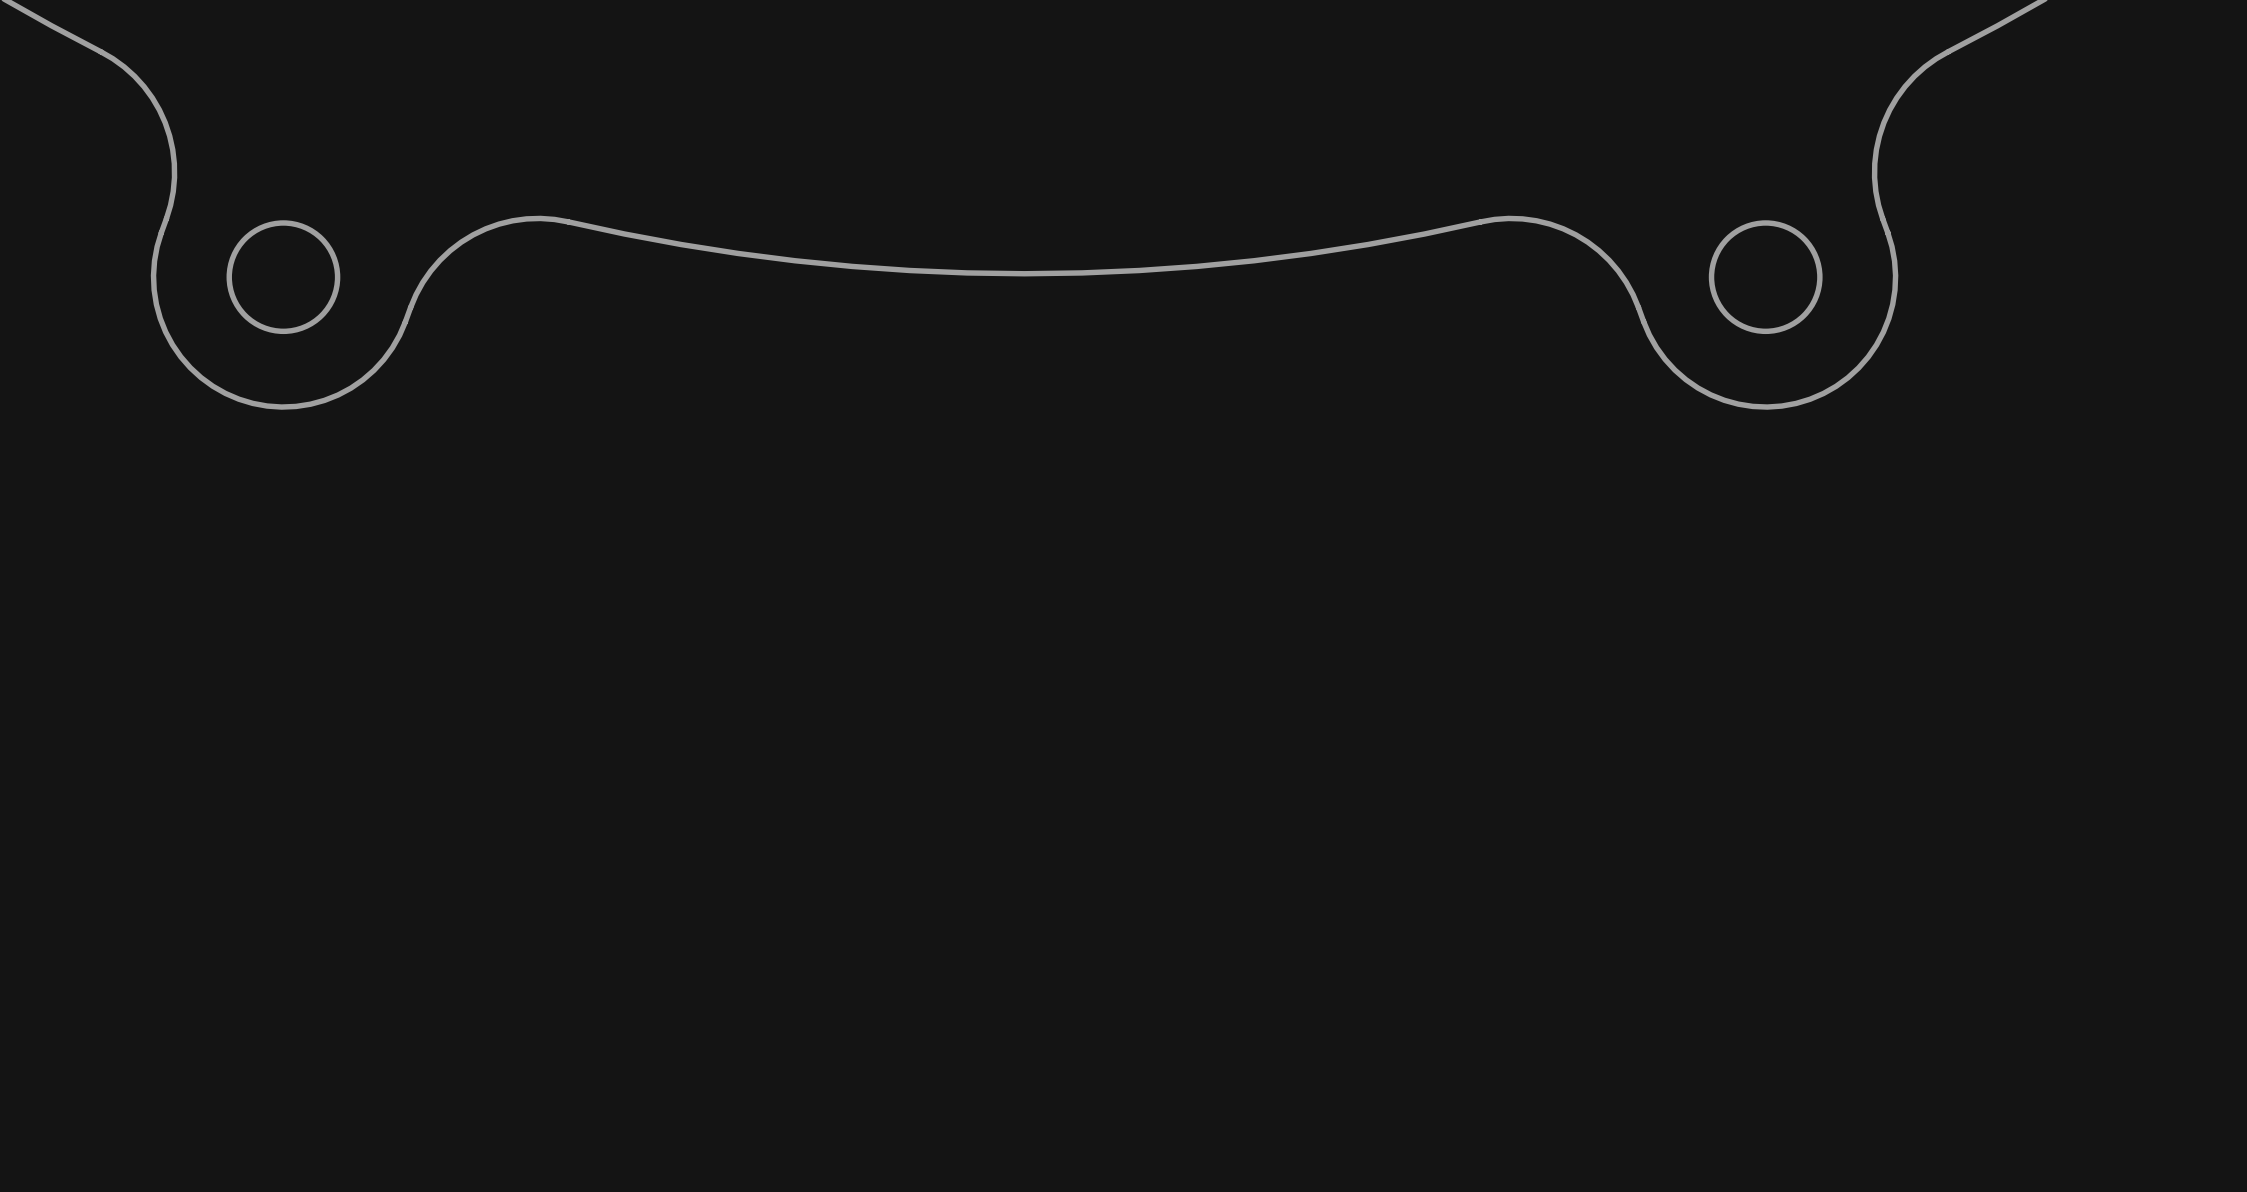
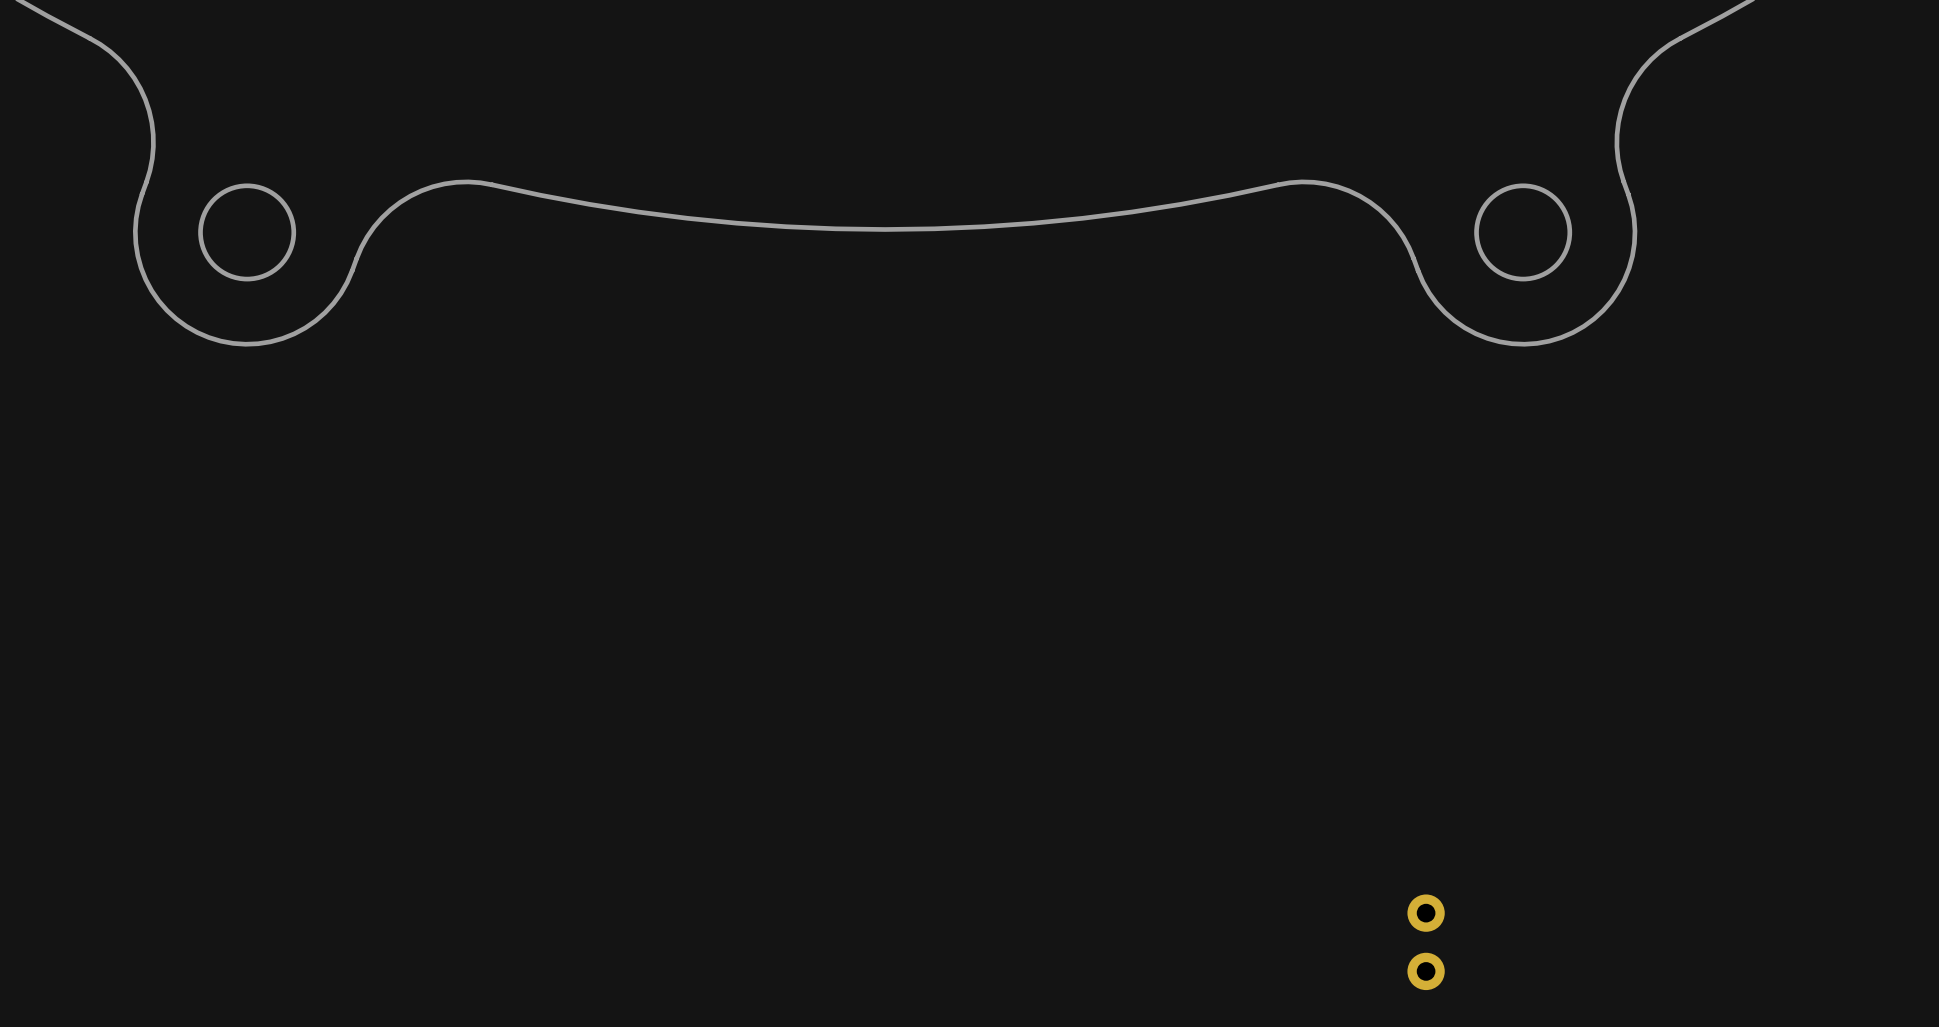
part: none -> (1426, 942)

